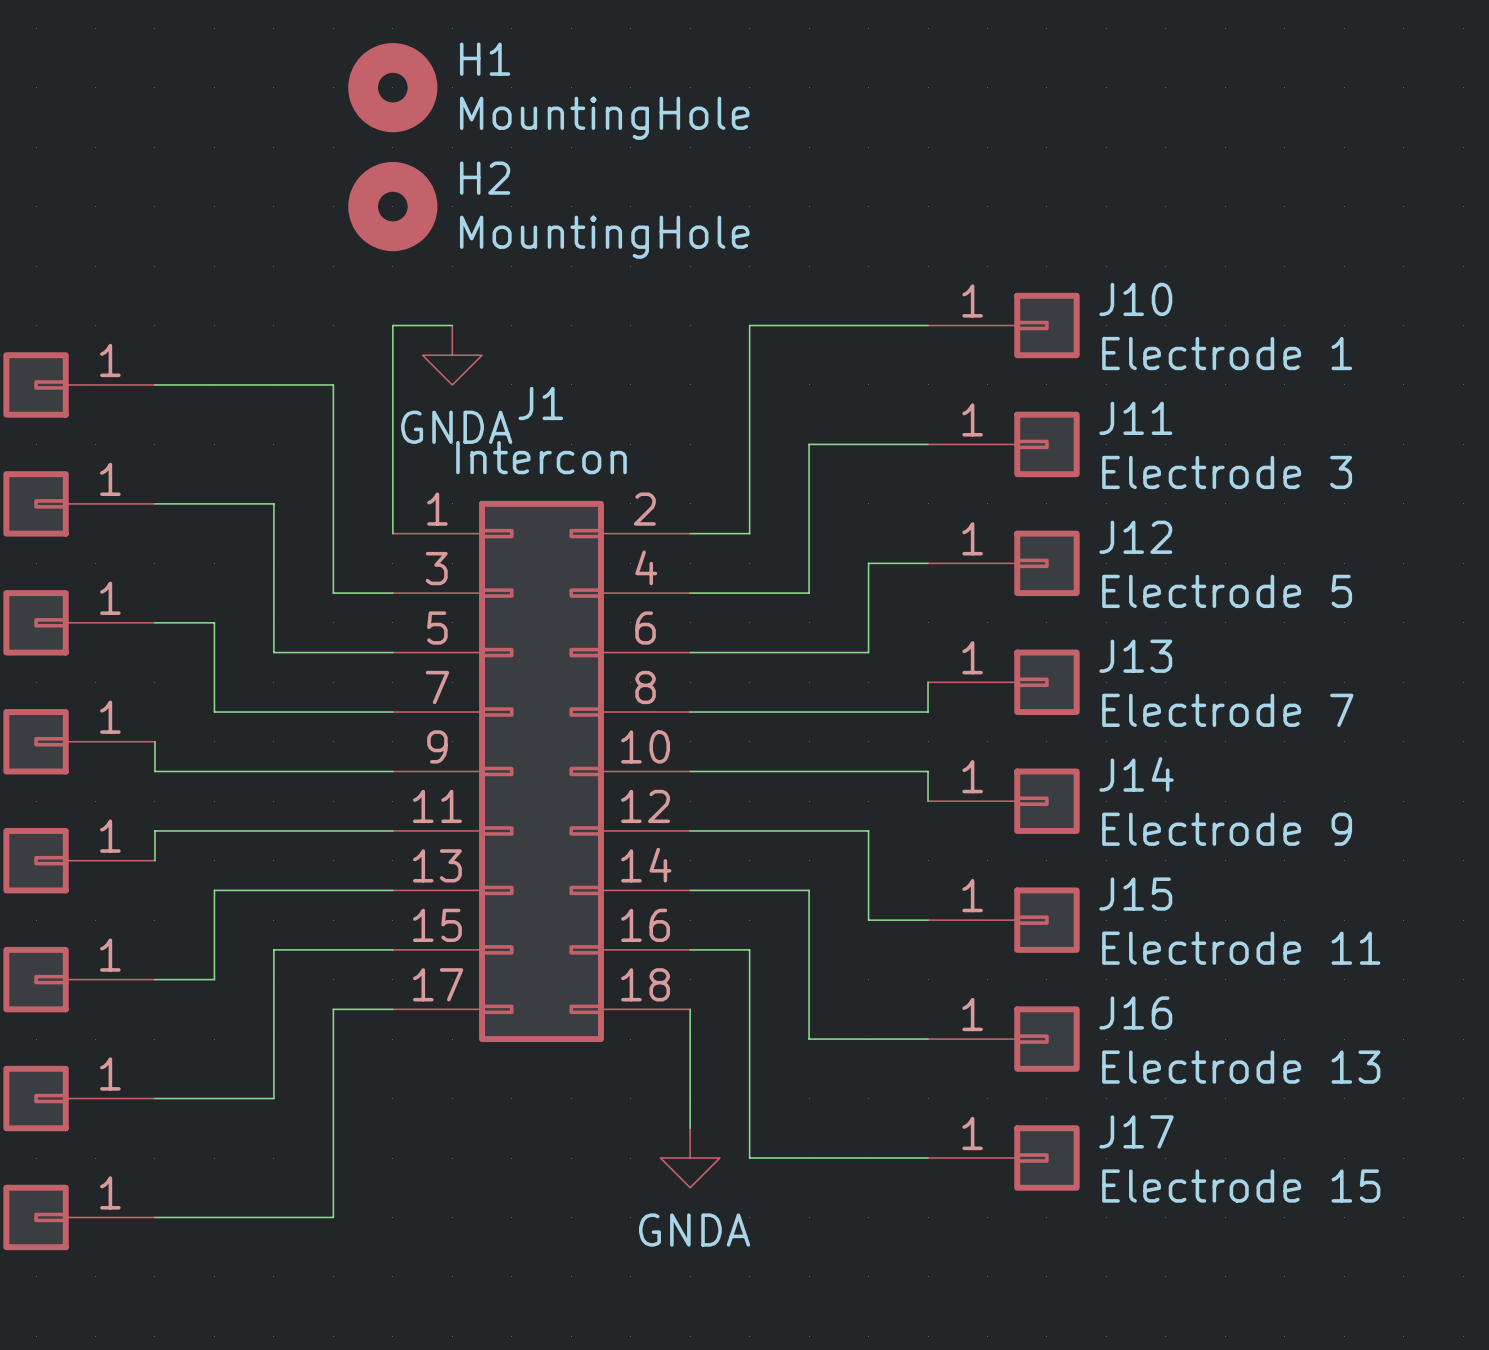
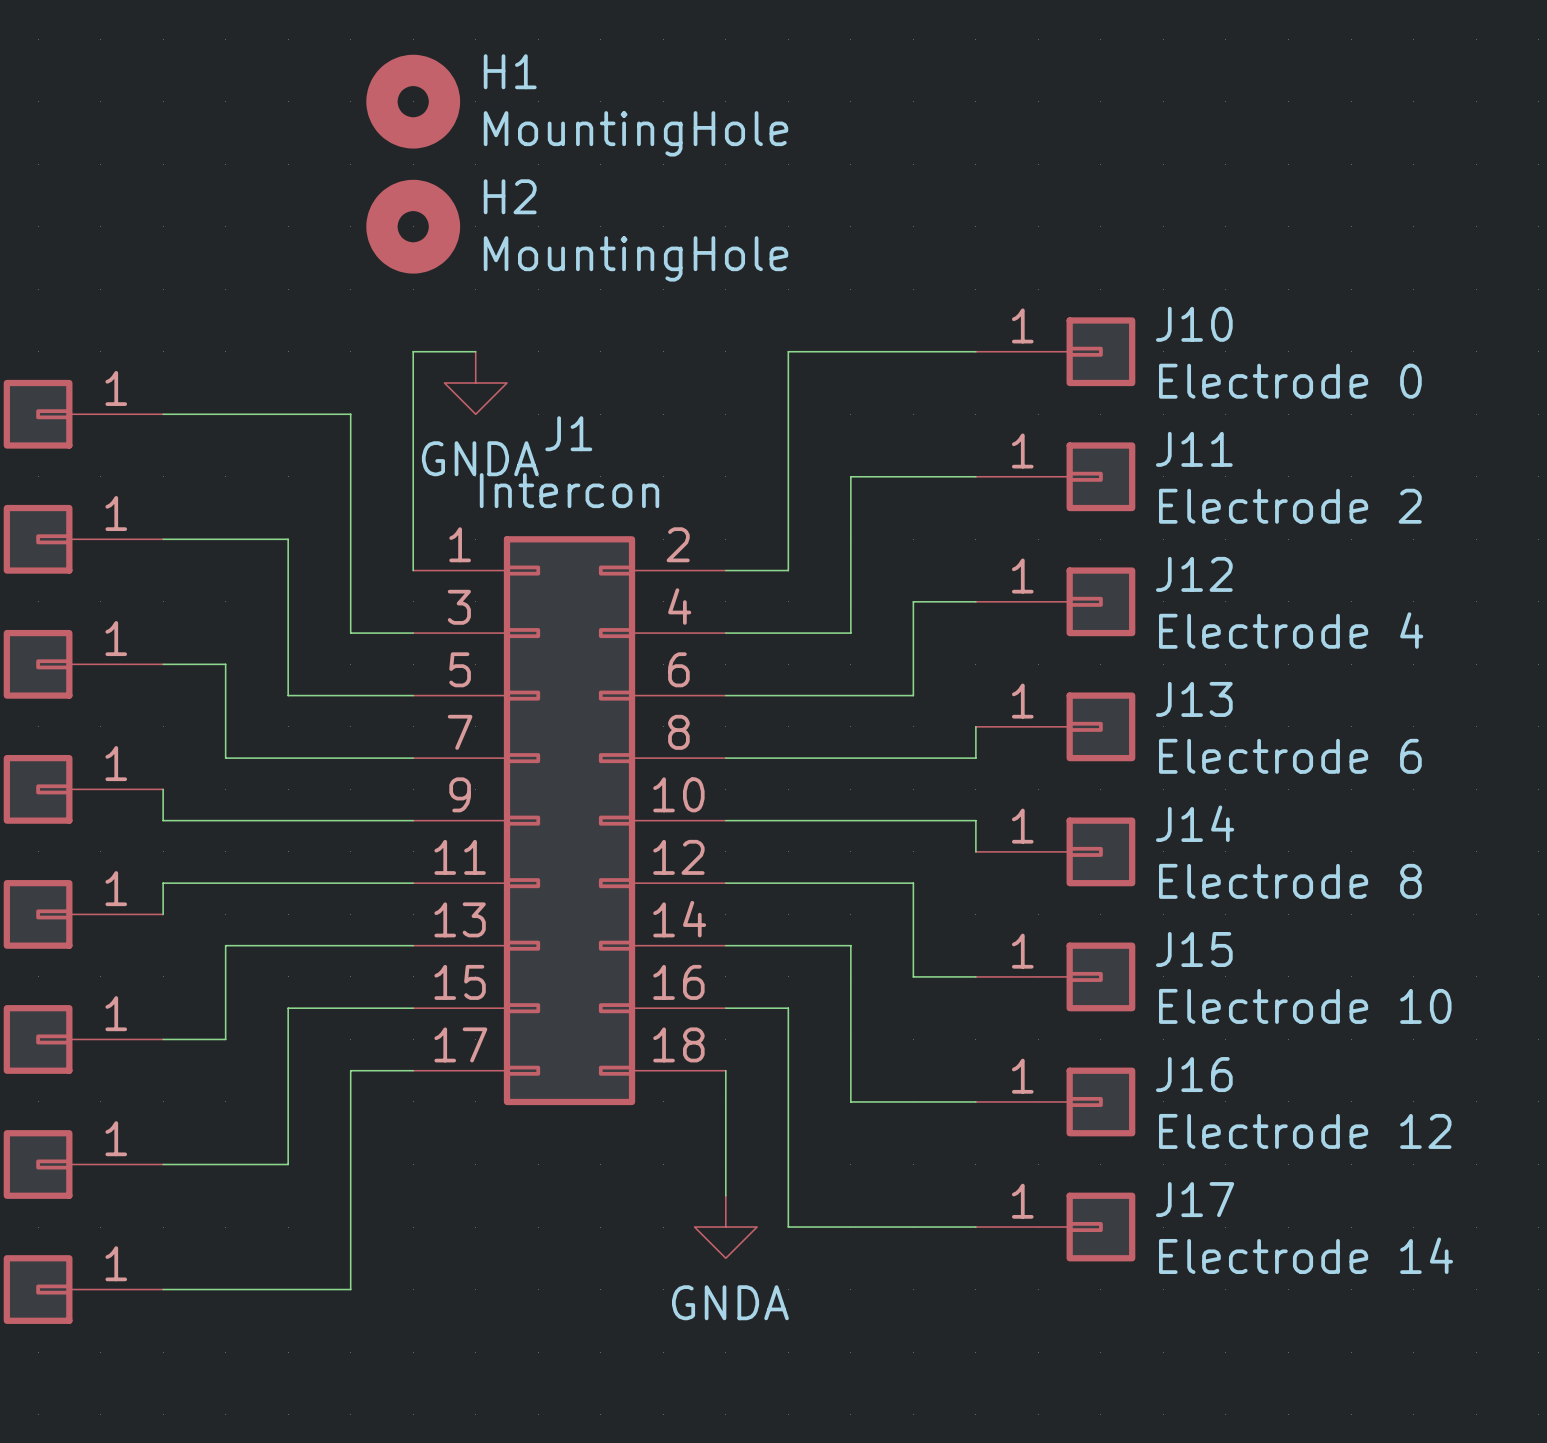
J10 value: Electrode 1 (1227, 353) -> Electrode 0 (1290, 381)
J11 value: Electrode 3 (1227, 472) -> Electrode 2 (1290, 506)
J12 value: Electrode 5 (1227, 591) -> Electrode 4 (1291, 630)
J13 value: Electrode 7 (1227, 710) -> Electrode 6 (1290, 756)
J14 value: Electrode 9 (1227, 829) -> Electrode 8 (1290, 881)
J15 value: Electrode 11 (1241, 948) -> Electrode 10 (1305, 1006)
J16 value: Electrode 13 (1241, 1067) -> Electrode 12 (1305, 1131)
J17 value: Electrode 15 (1241, 1186) -> Electrode 14 (1305, 1255)

